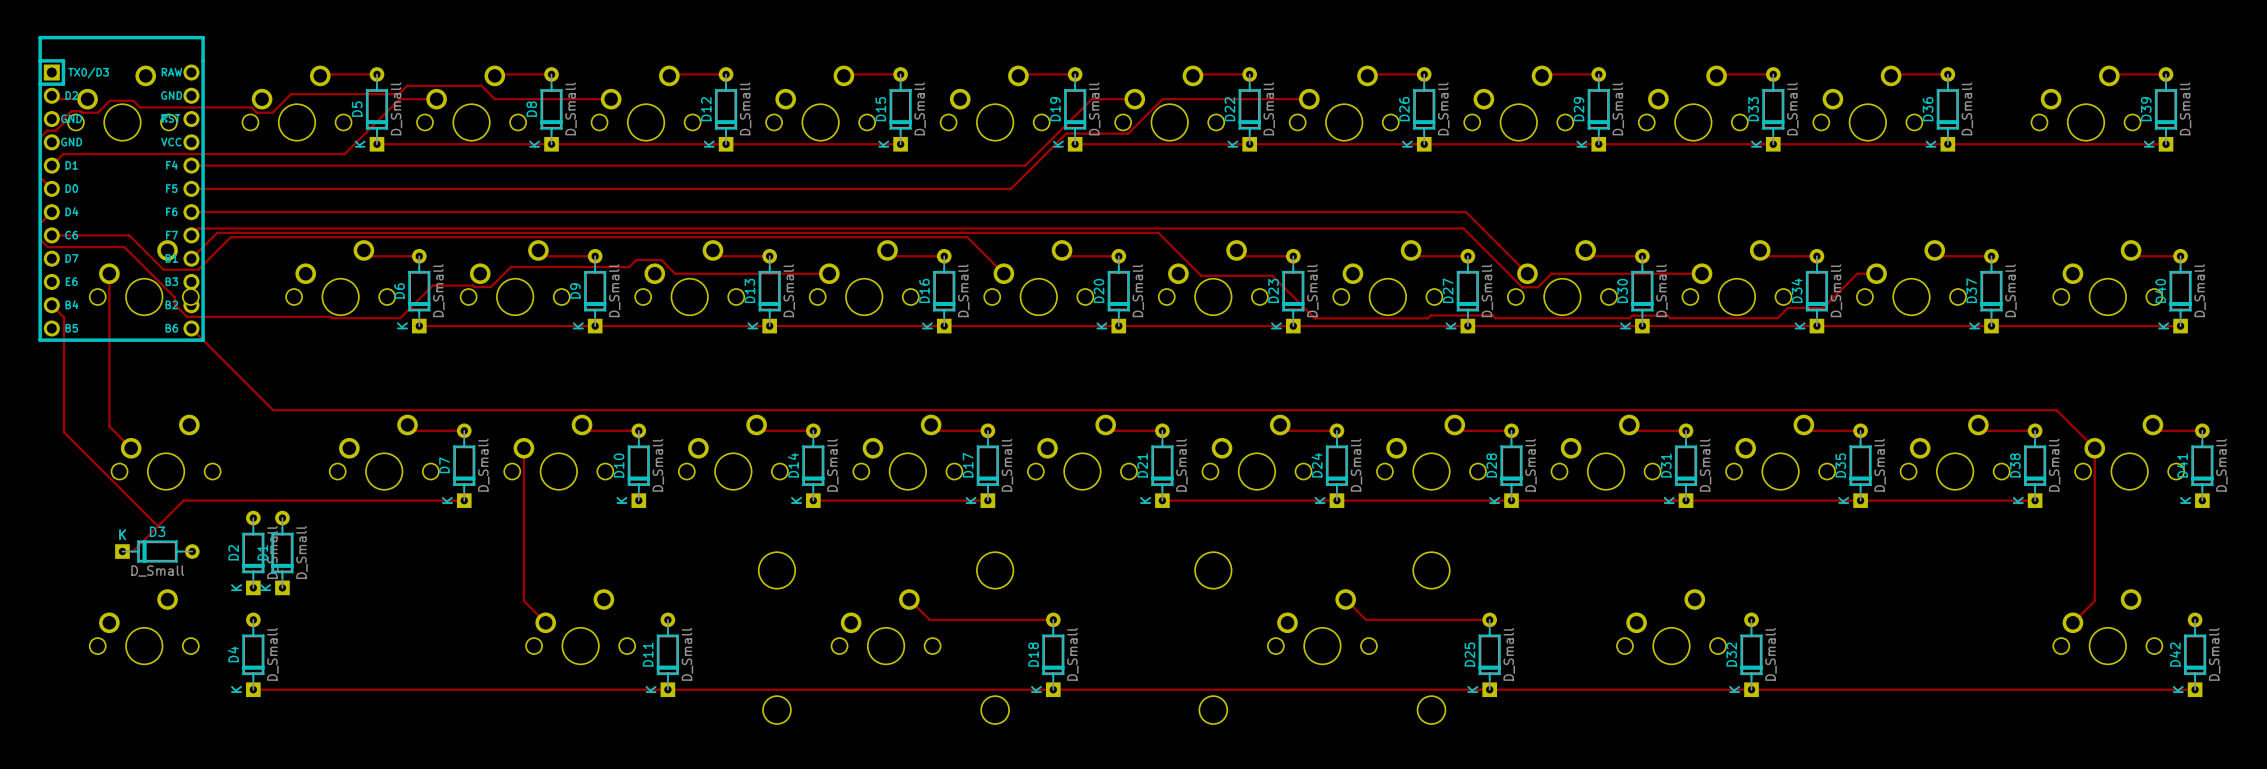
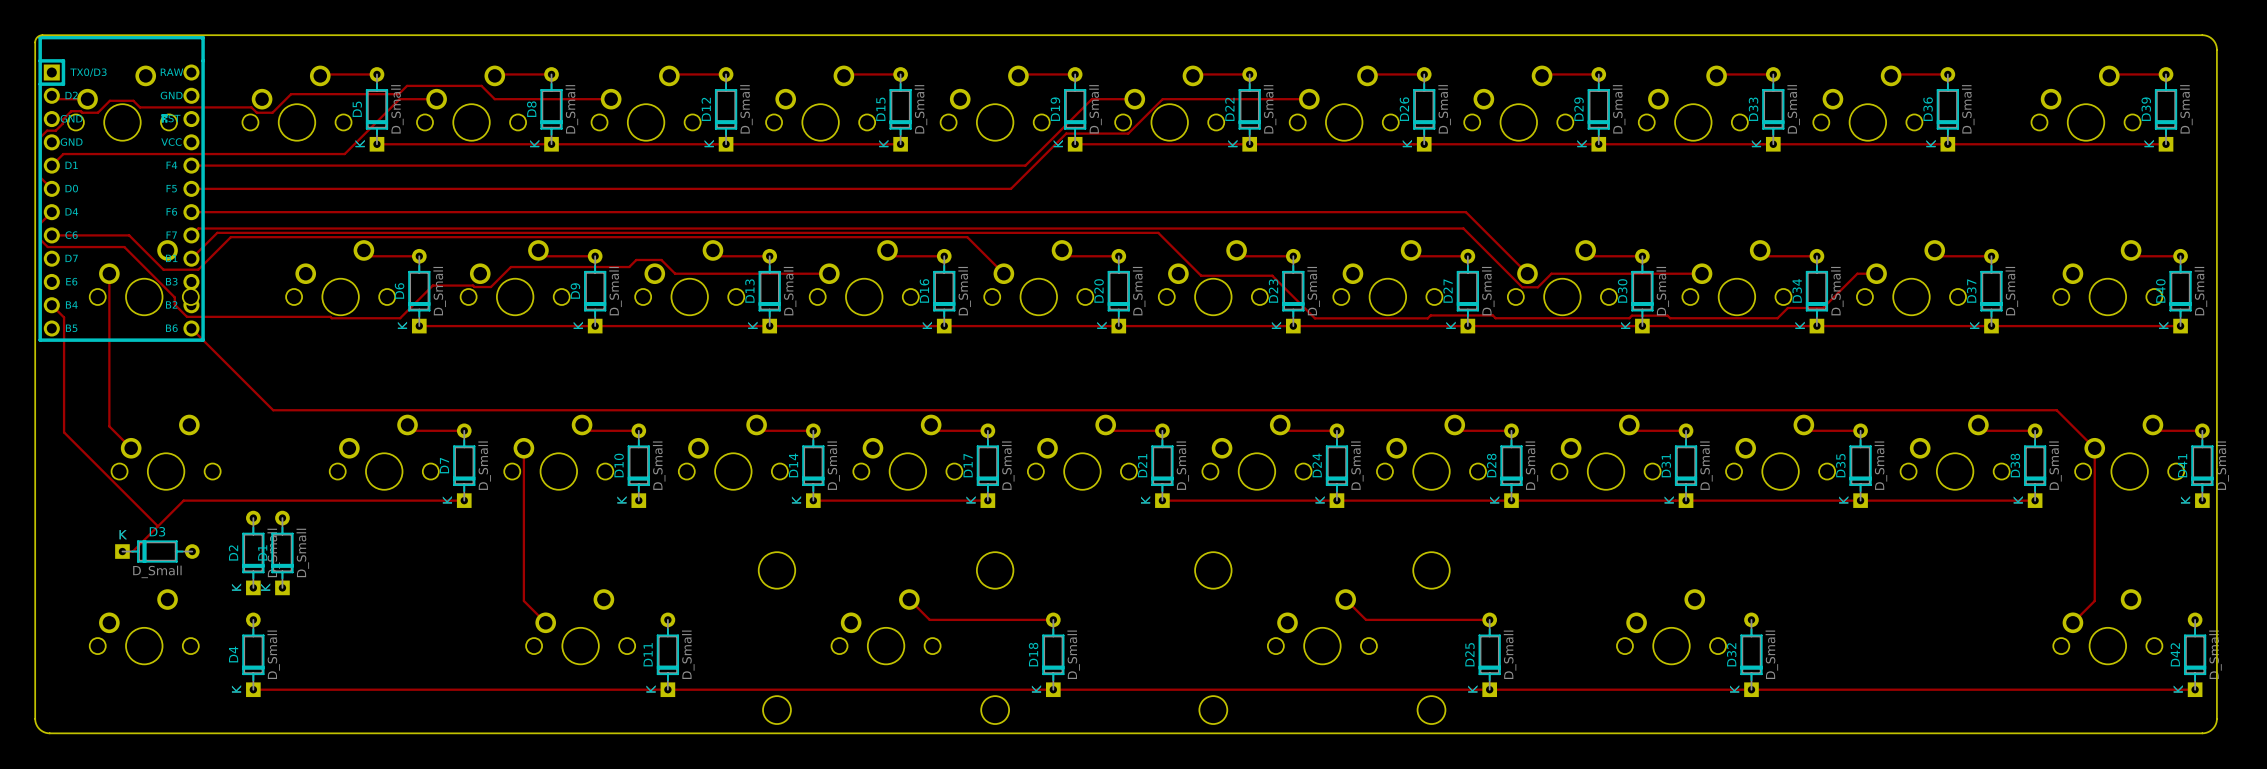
board edge: none -> (35, 42) (35, 718) (38, 727) (45, 732) (2202, 733) (2211, 730) (2216, 722) (2216, 49) (2213, 40) (2206, 35) (42, 35) (37, 37) (35, 42)

